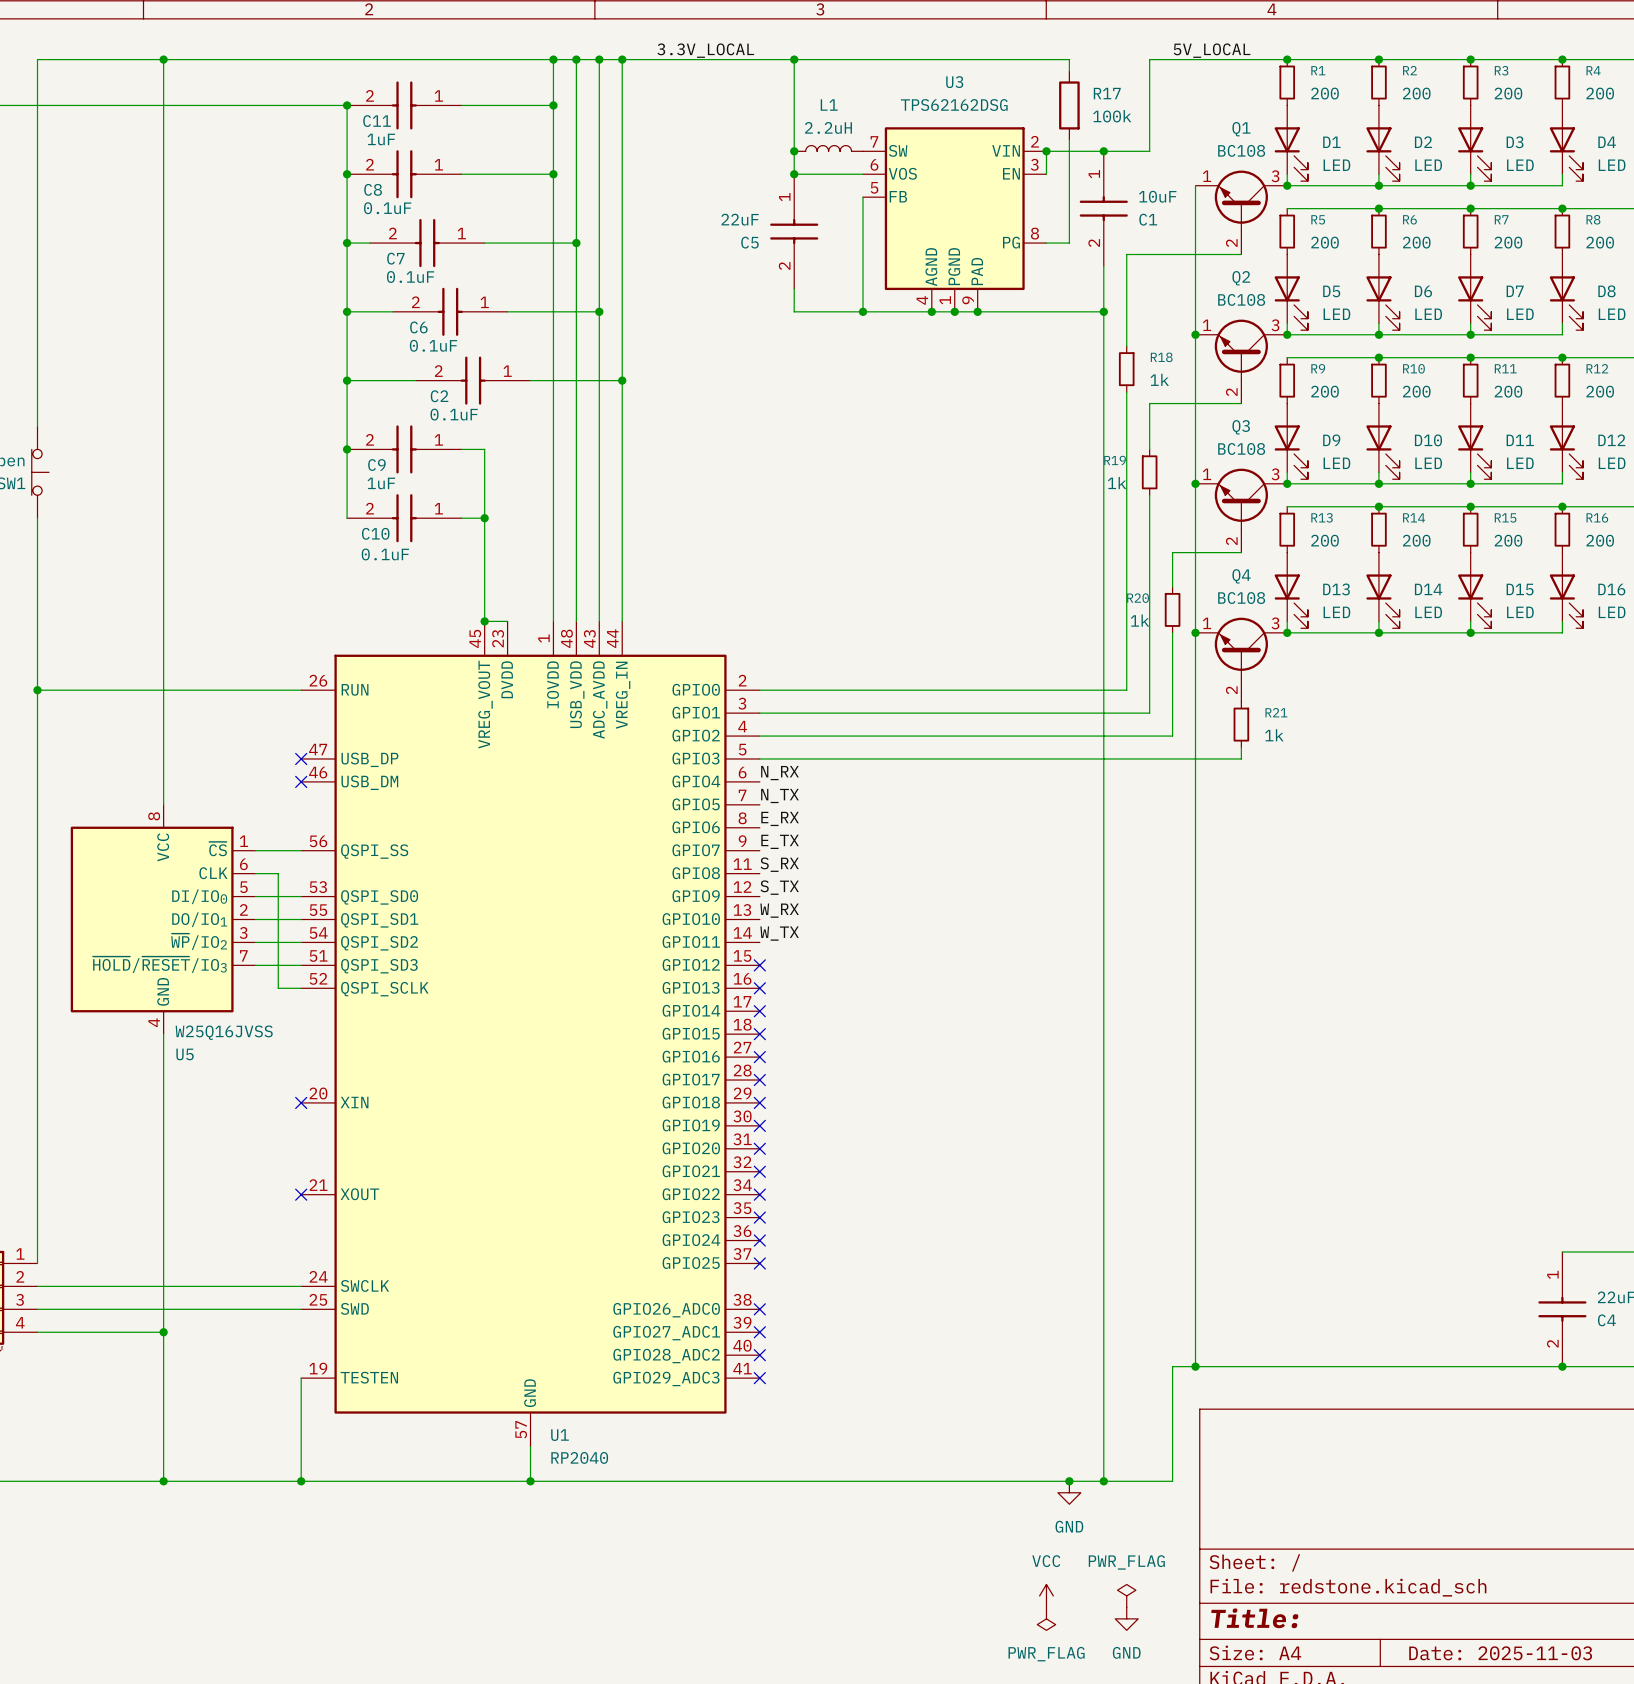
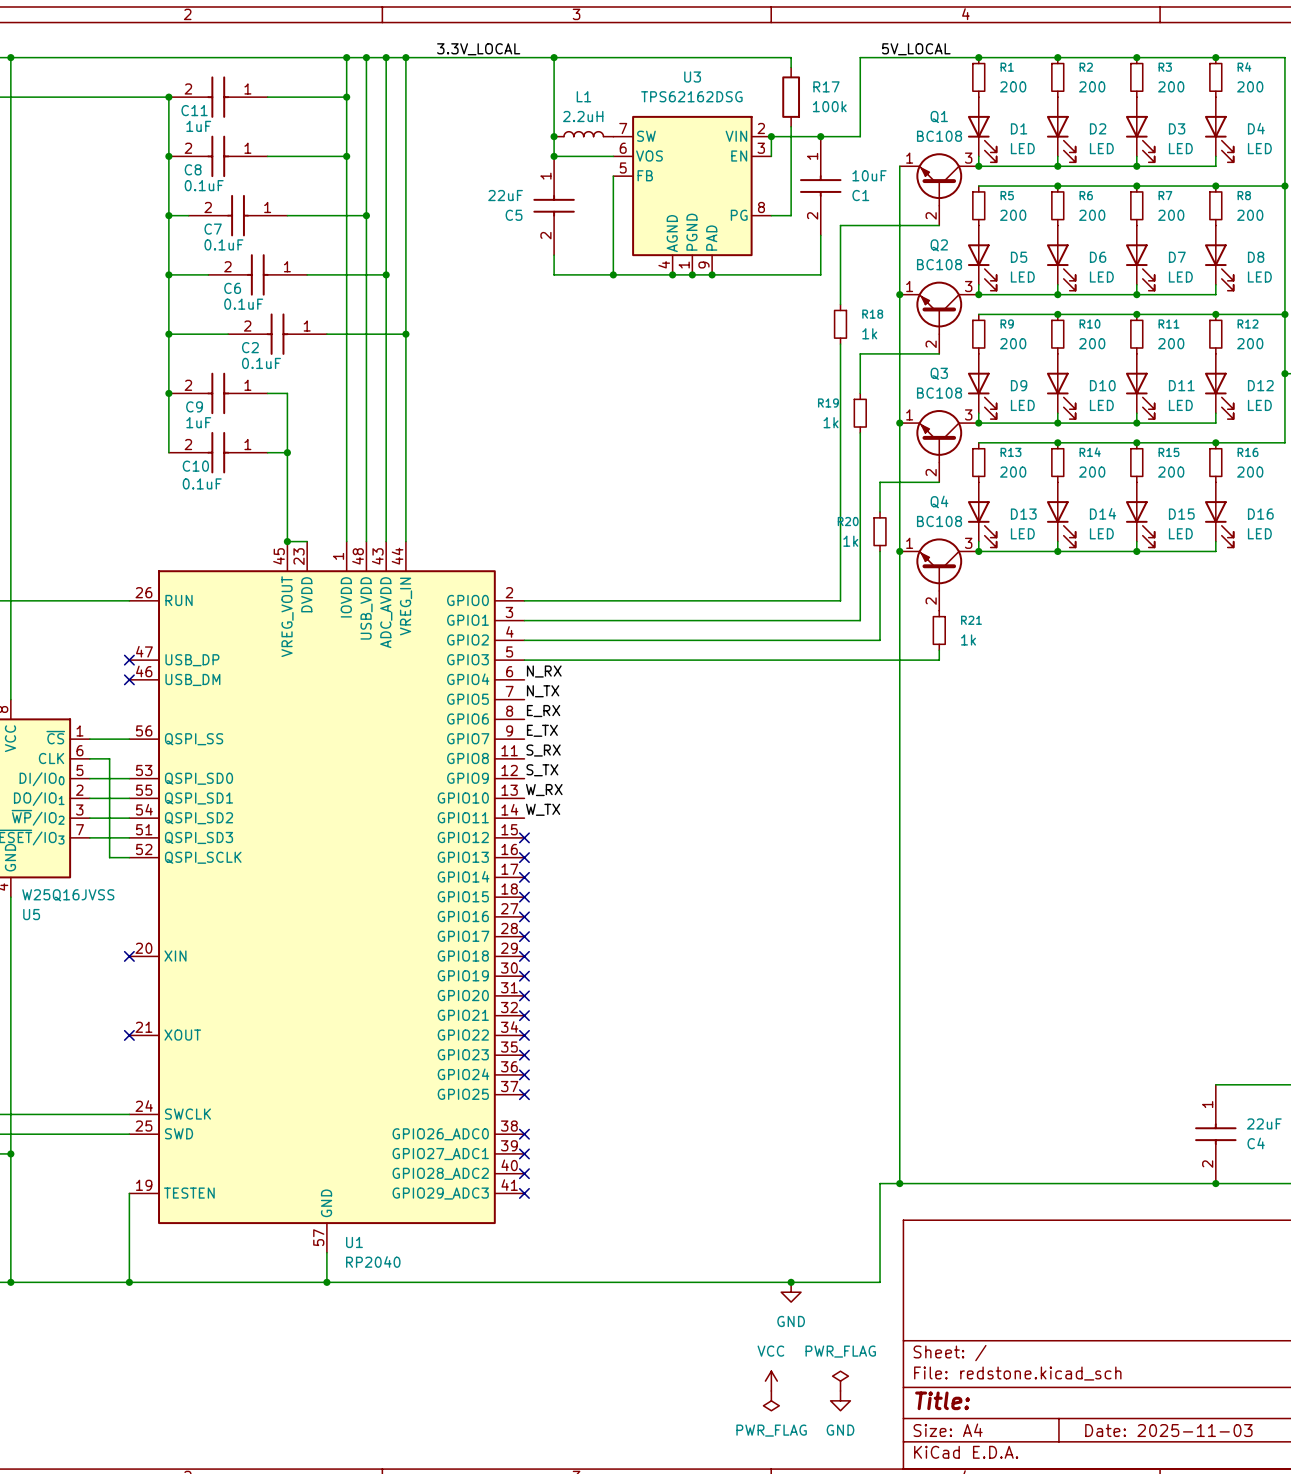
wire: (1103, 311) (1103, 1481) -> none
junction: (1103, 311) -> none
junction: (1103, 1481) -> none

